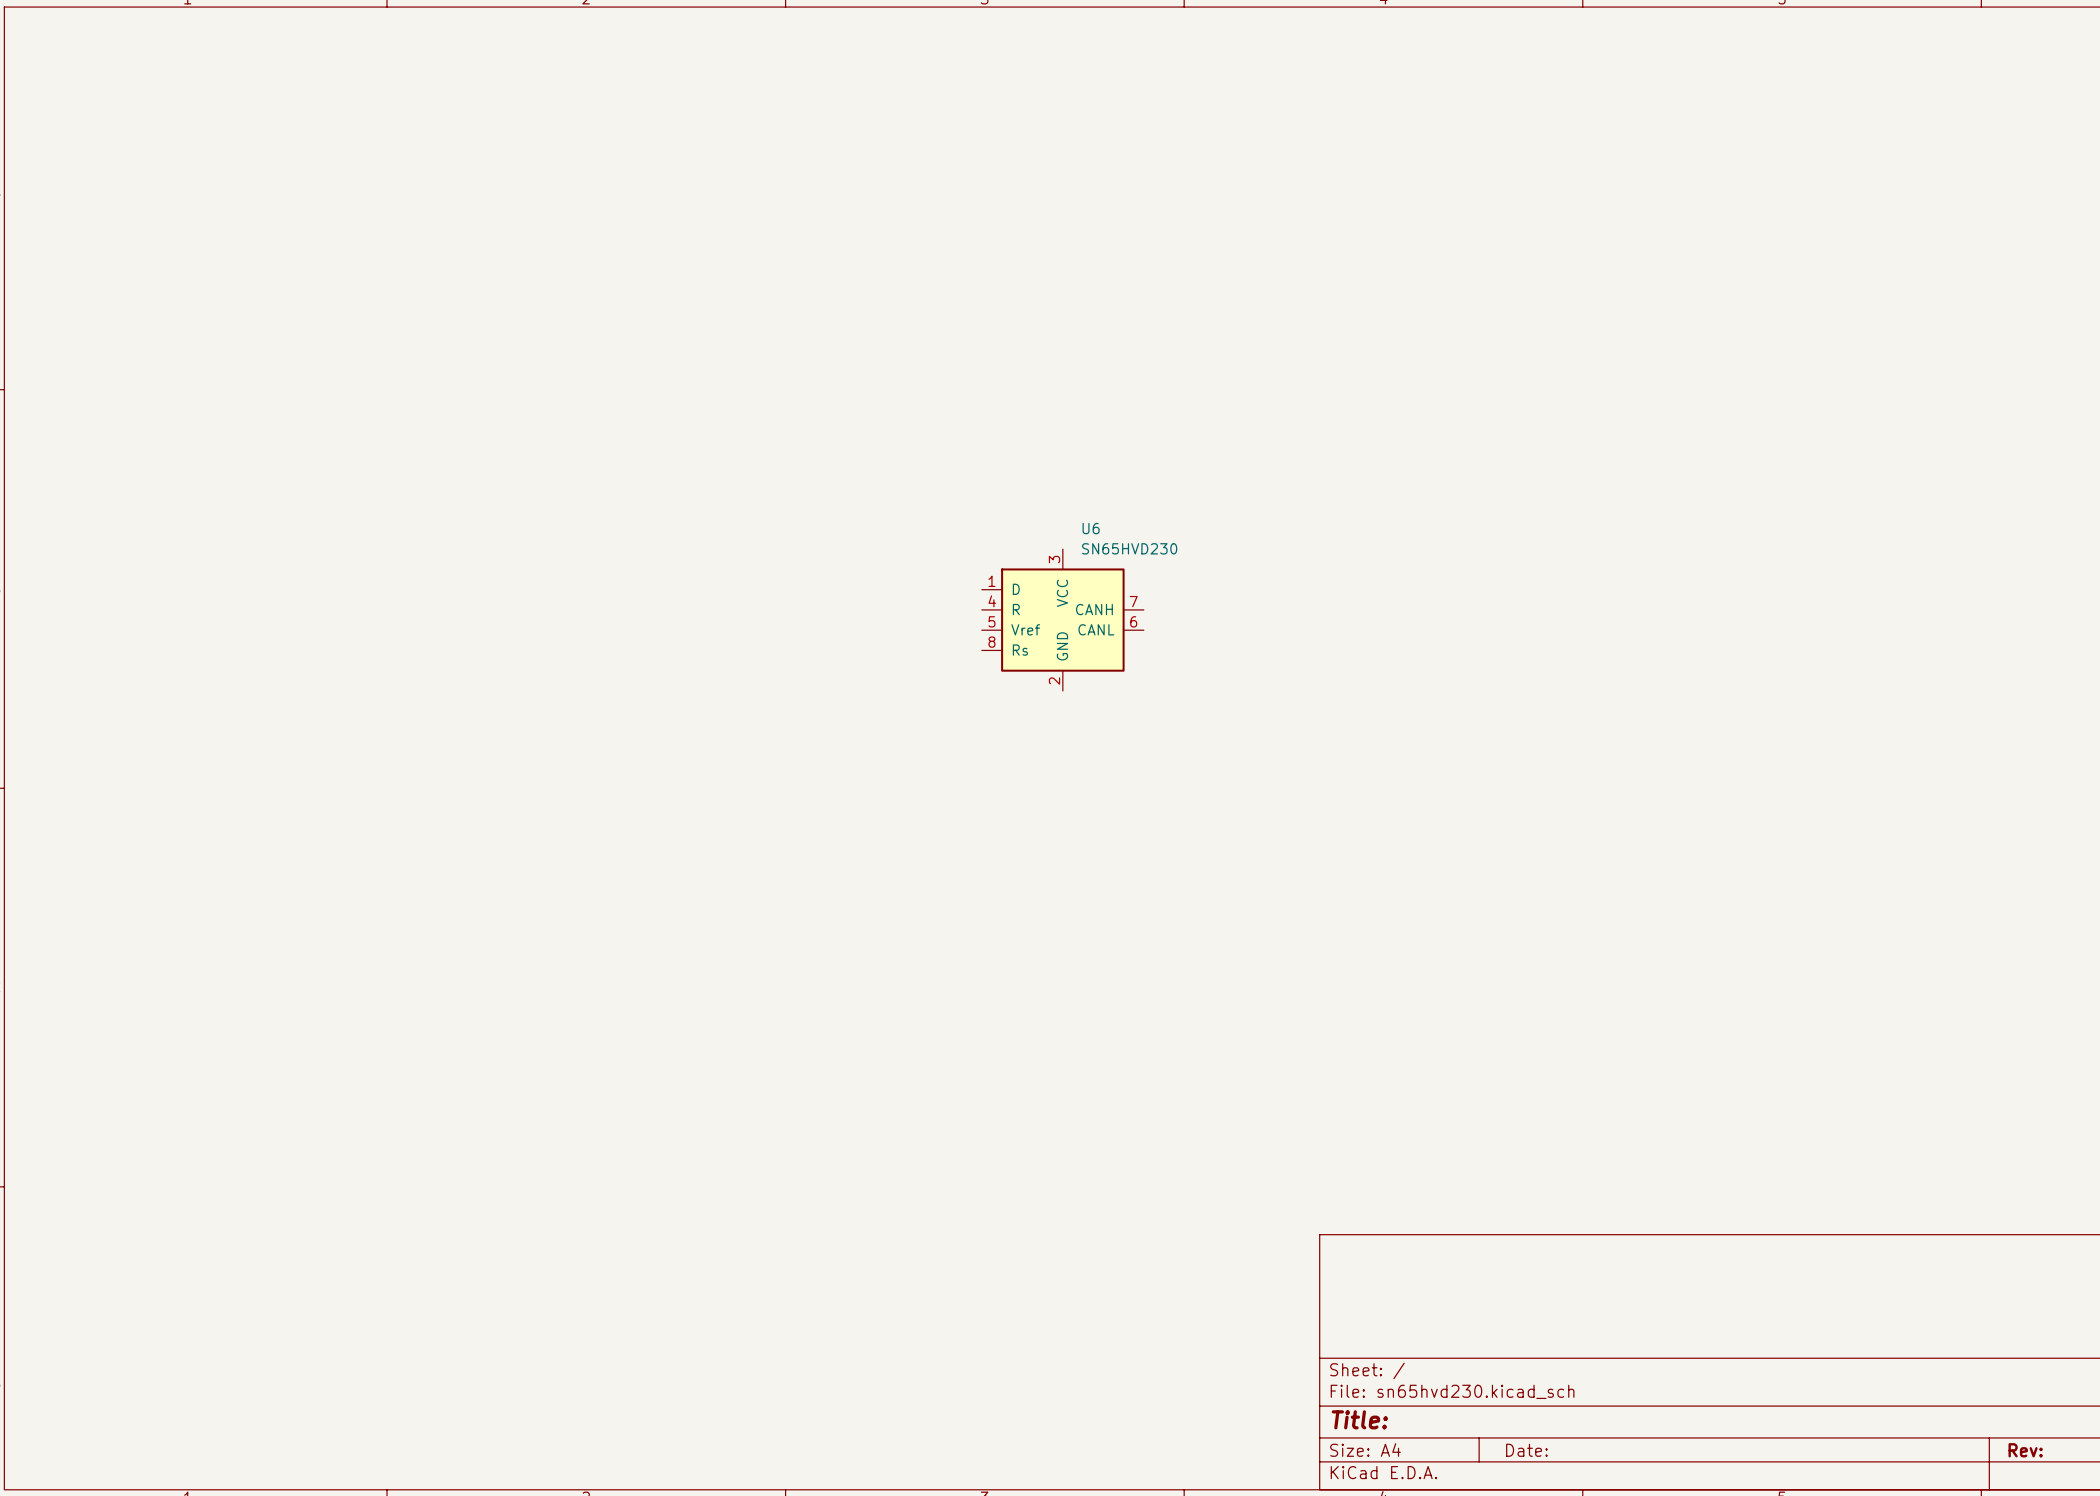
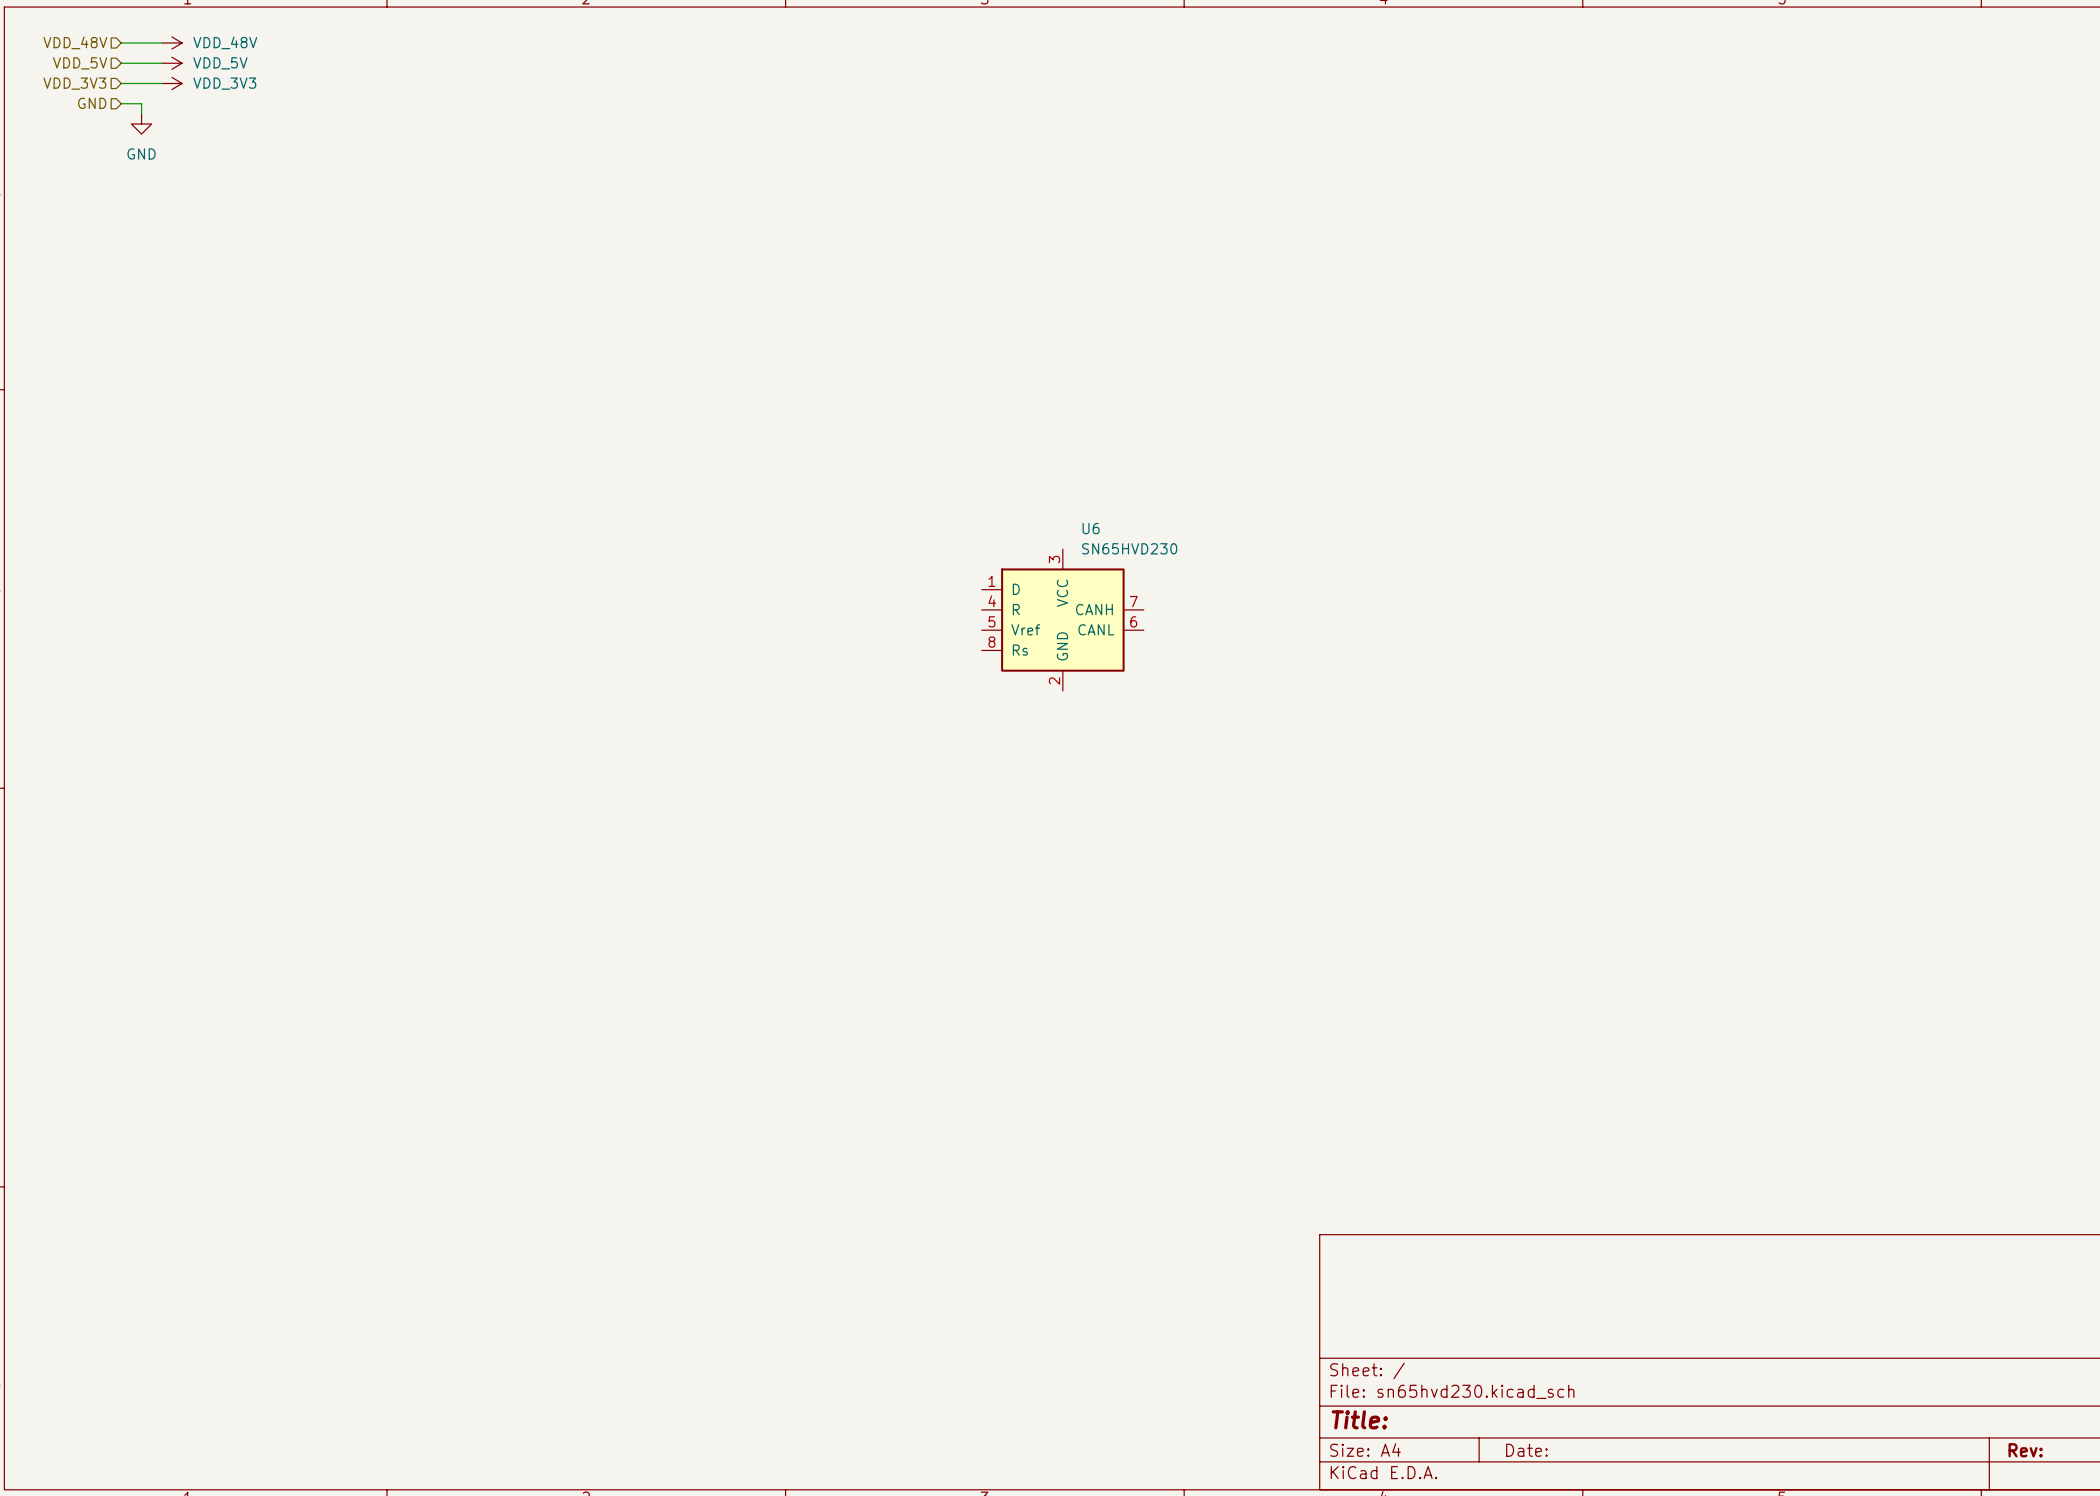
hierarchical label: none -> VDD_48V (75, 42)
wire: none -> (121, 42) (161, 42)
power symbol: none -> VDD_48V (171, 42)
hierarchical label: none -> VDD_5V (80, 63)
wire: none -> (121, 63) (161, 63)
power symbol: none -> VDD_5V (171, 63)
hierarchical label: none -> VDD_3V3 (74, 83)
wire: none -> (121, 83) (161, 83)
power symbol: none -> VDD_3V3 (171, 83)
hierarchical label: none -> GND (92, 103)
wire: none -> (121, 103) (141, 103) (141, 113)
power symbol: none -> GND (141, 123)

